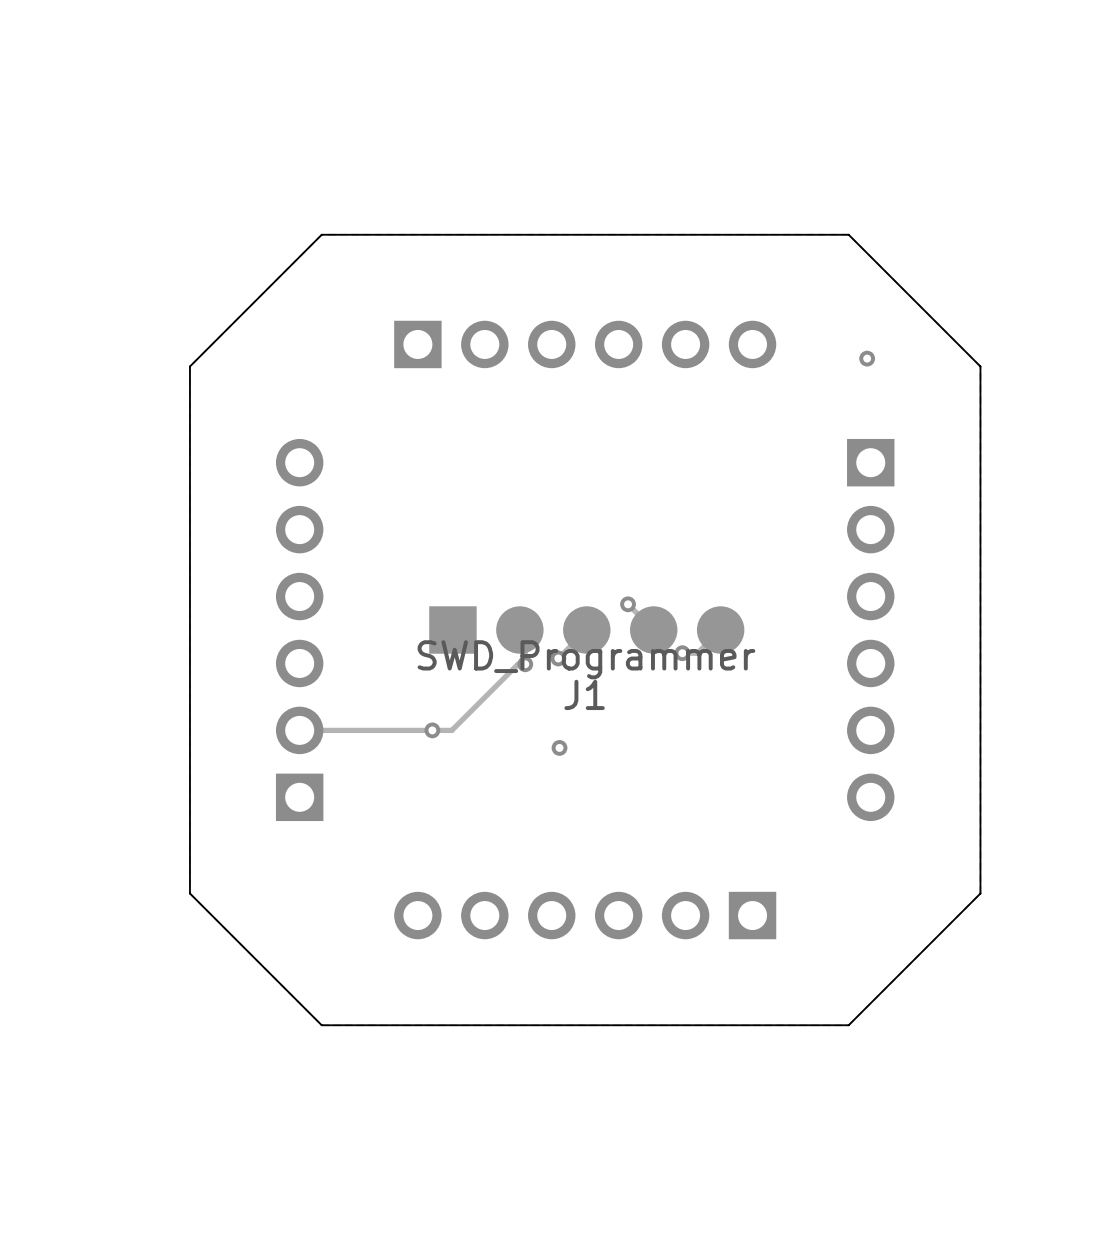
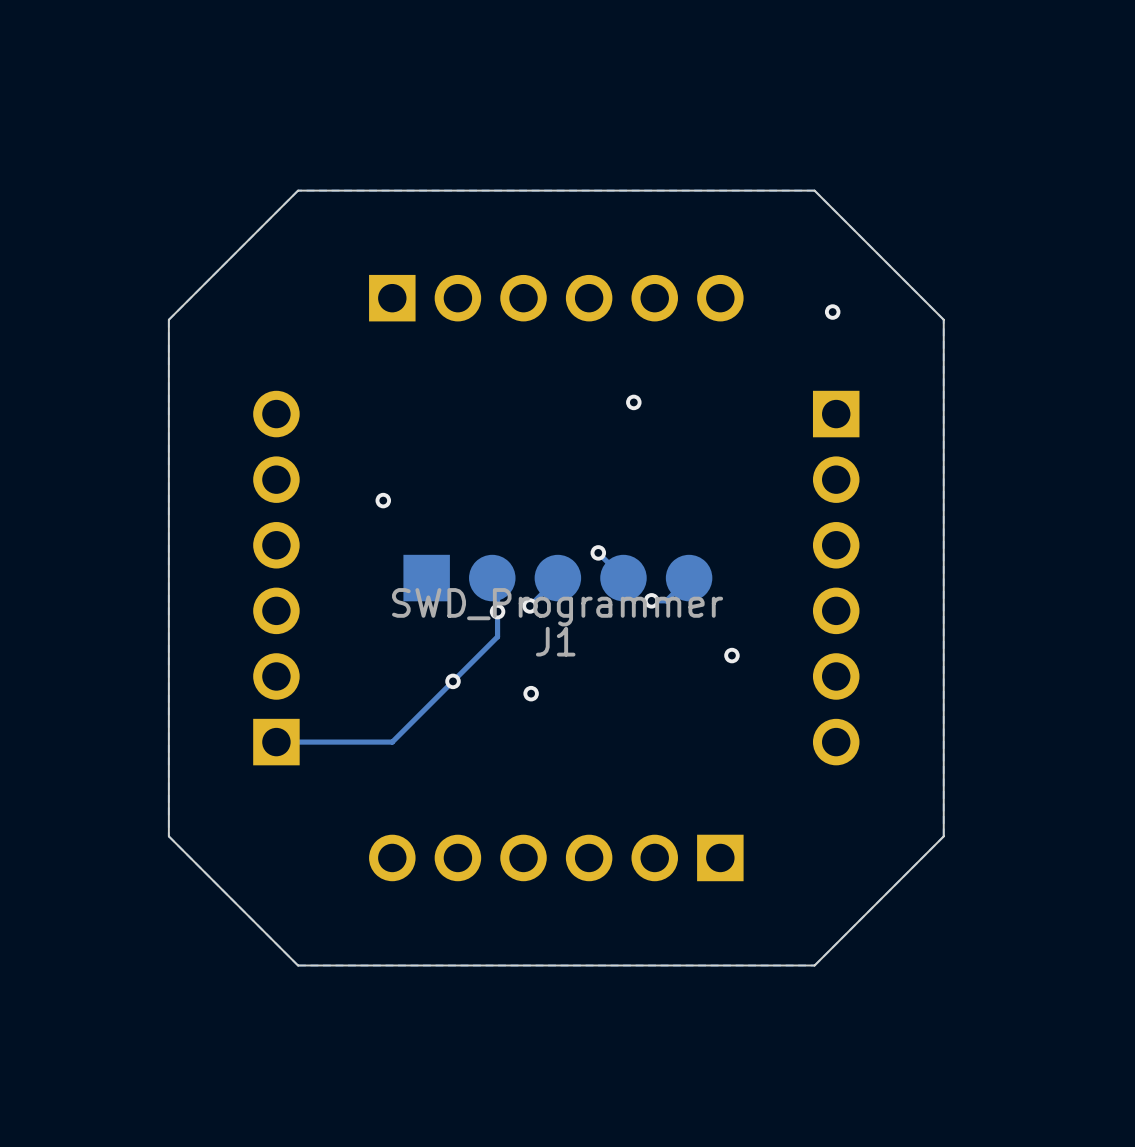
via: none -> (633, 402)
via: none -> (383, 500)
track: (525, 664) (518, 664) (451, 730) (299, 730) -> (497, 611) (497, 636) (392, 742) (276, 742)
via: none -> (731, 655)
via position: (432, 730) -> (453, 681)

